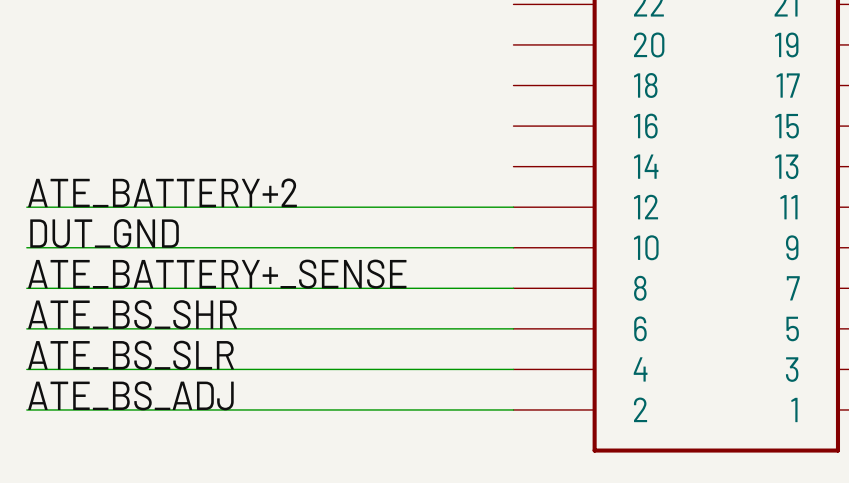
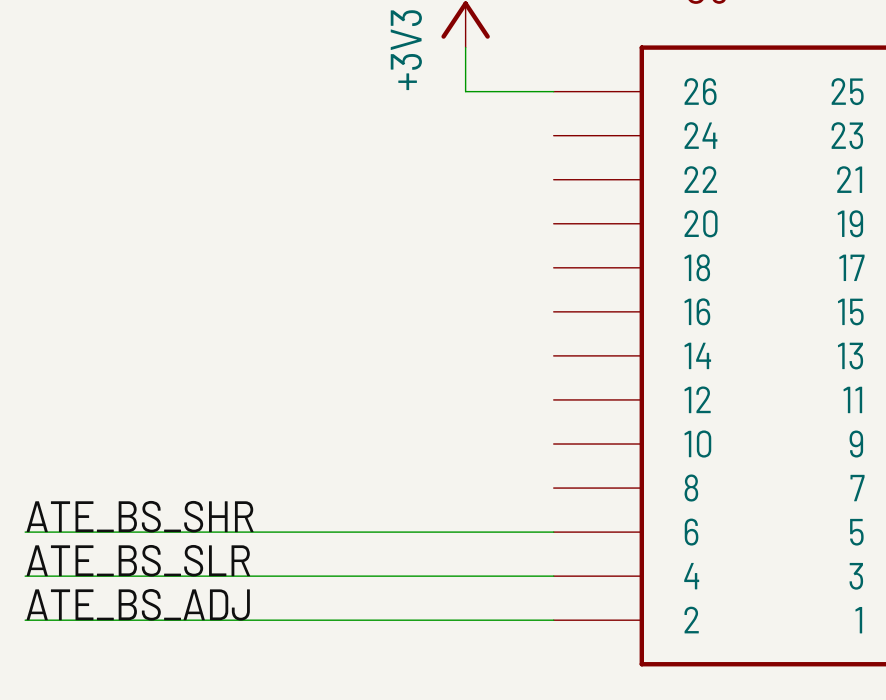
label: ATE_BATTERY+2 (162, 192) -> none
wire: (26, 207) (513, 207) -> none
label: DUT_GND (104, 233) -> none
wire: (26, 247) (513, 247) -> none
label: ATE_BATTERY+_SENSE (217, 274) -> none
wire: (26, 288) (513, 288) -> none

